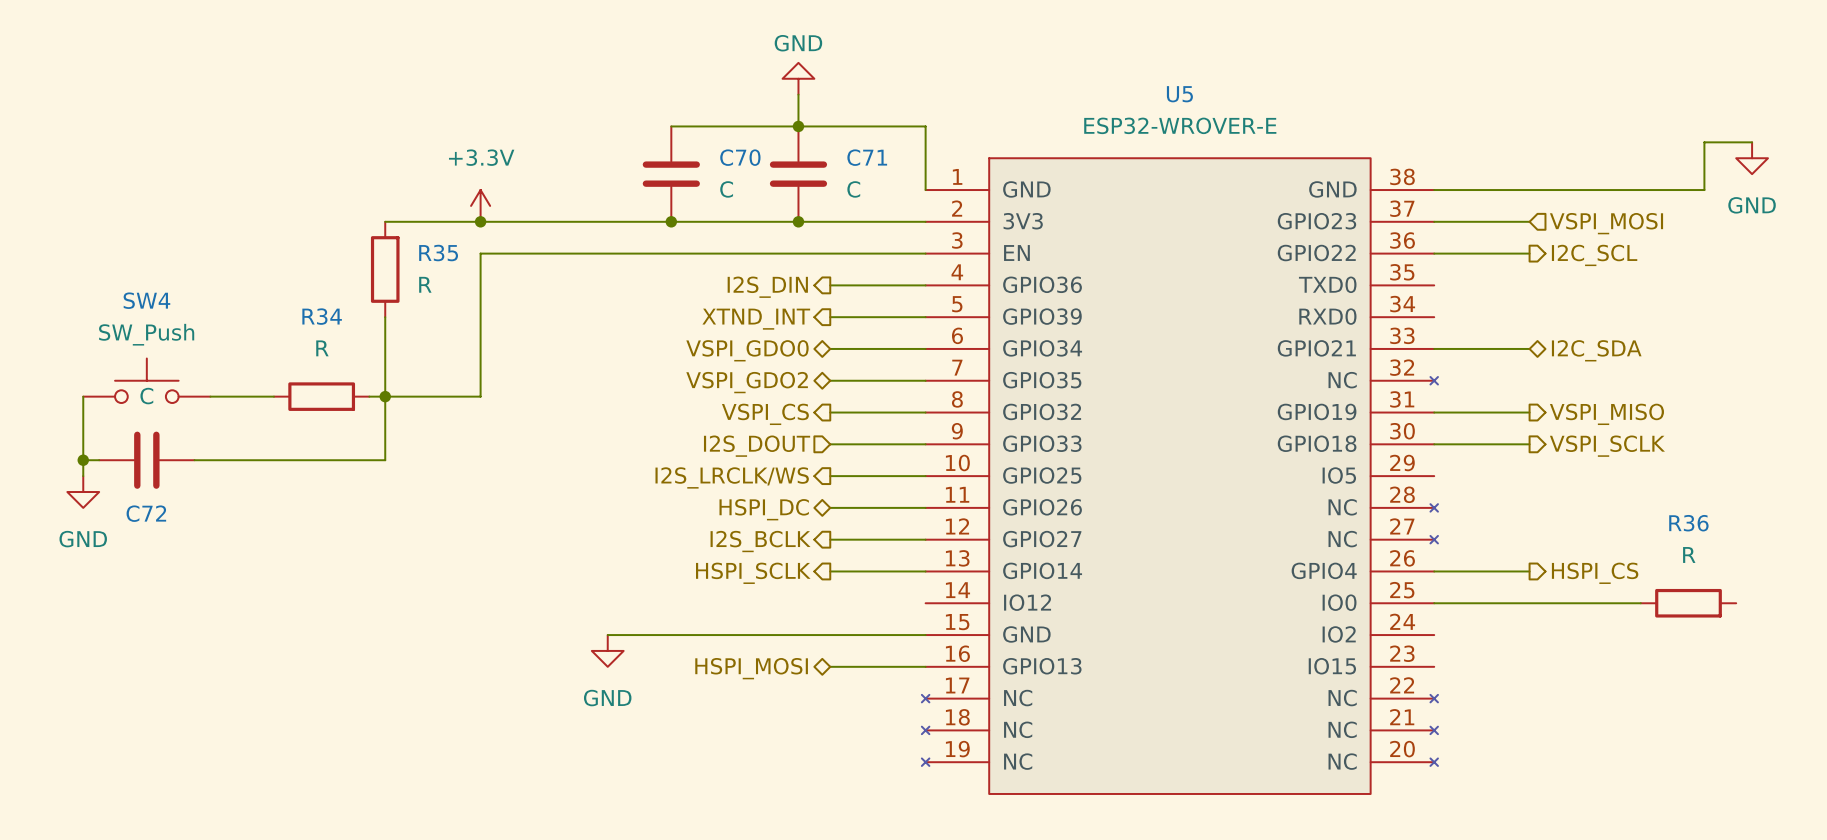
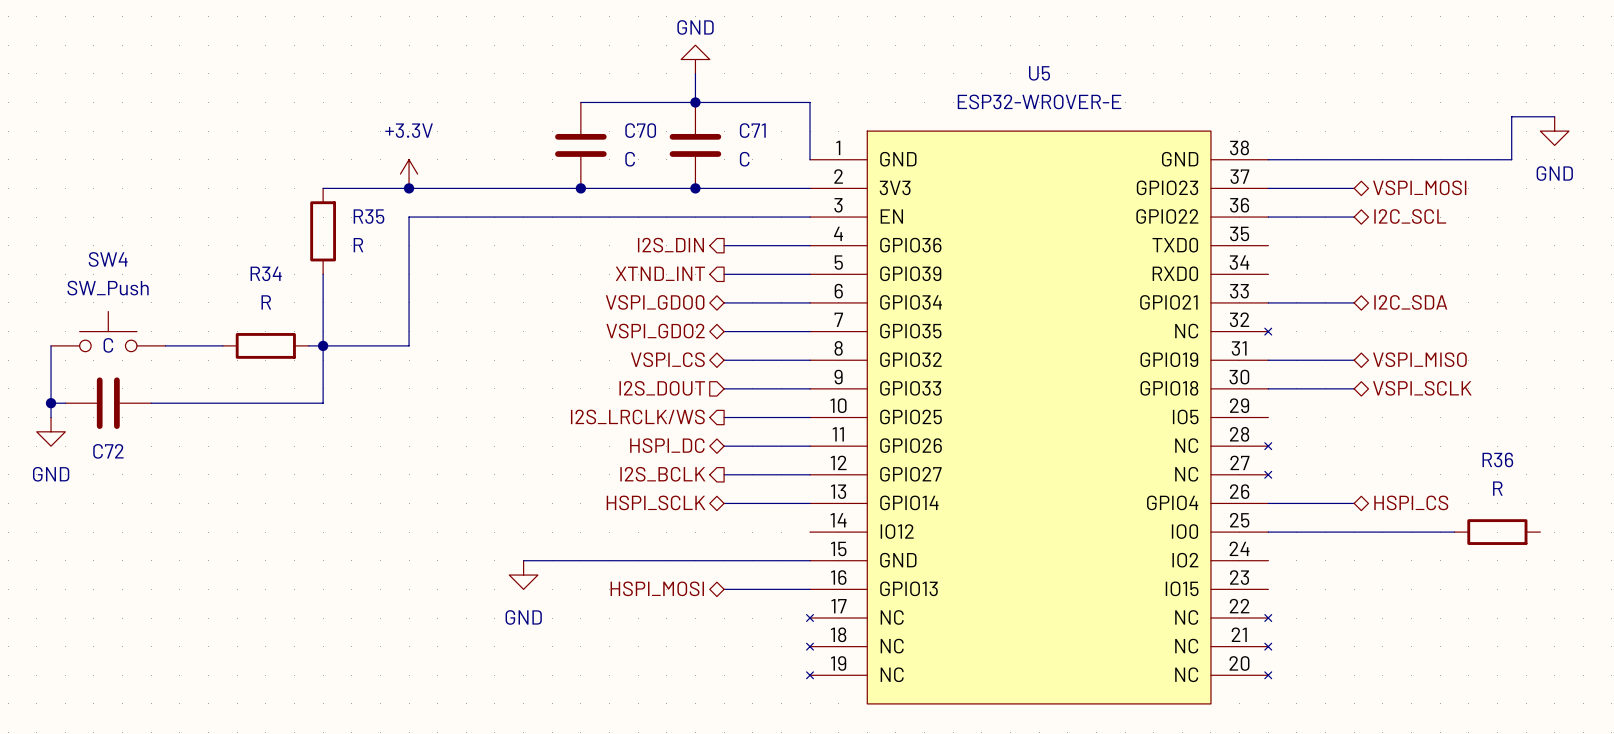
hierarchical label shape: input (1606, 223) -> bidirectional (1419, 187)
hierarchical label shape: output (1594, 255) -> bidirectional (1410, 216)
hierarchical label shape: output (765, 414) -> bidirectional (667, 359)
hierarchical label shape: output (1606, 414) -> bidirectional (1419, 359)
hierarchical label shape: output (1607, 446) -> bidirectional (1422, 388)
hierarchical label shape: output (753, 573) -> bidirectional (656, 502)
hierarchical label shape: output (1595, 573) -> bidirectional (1411, 502)

